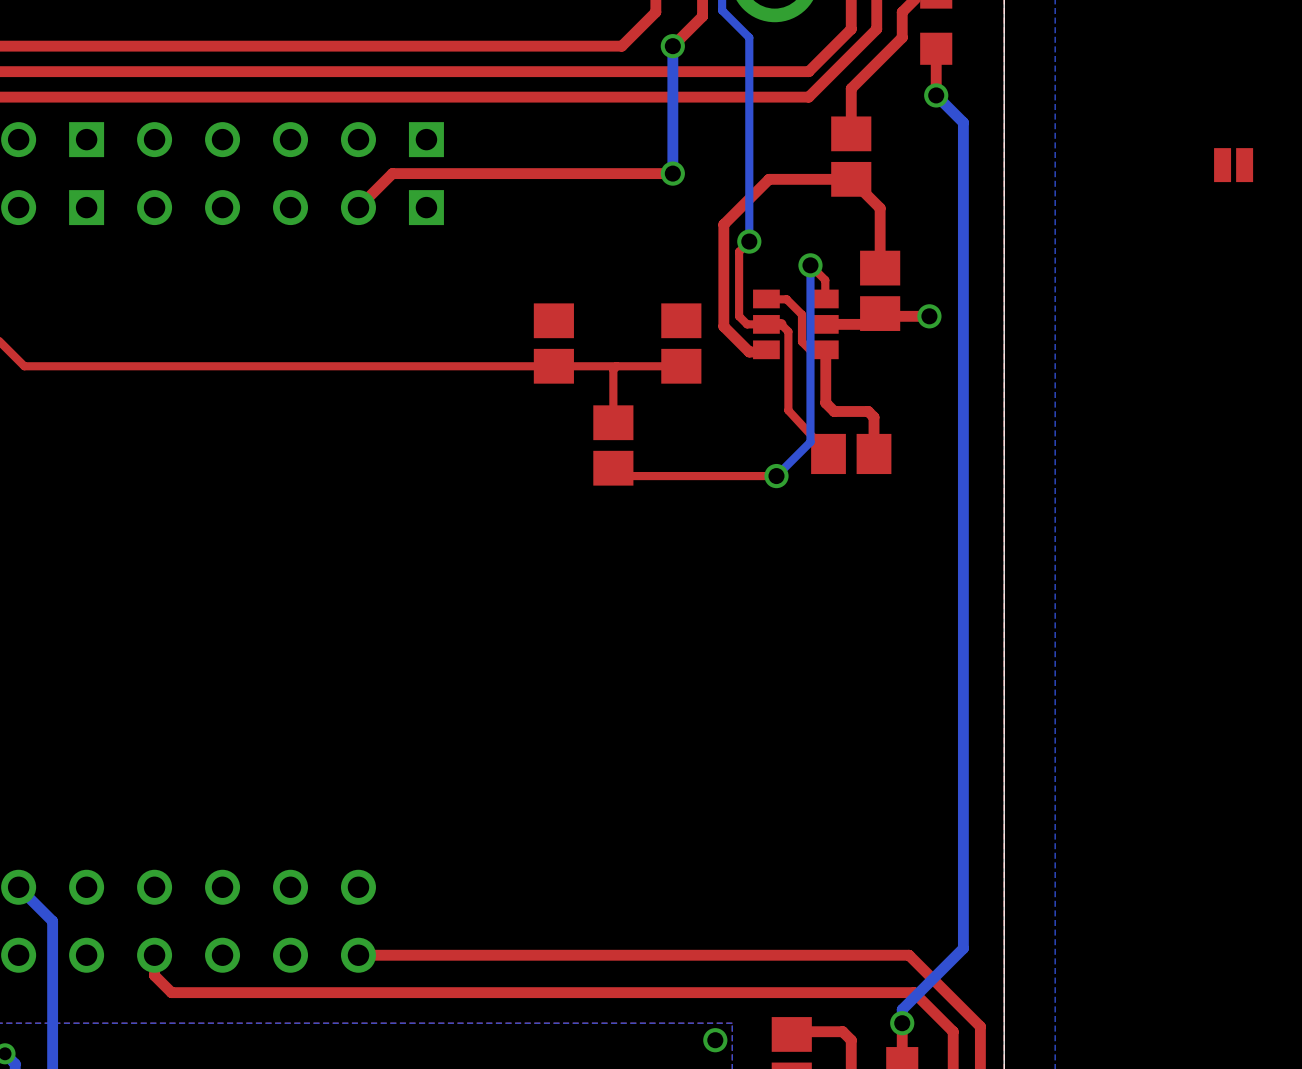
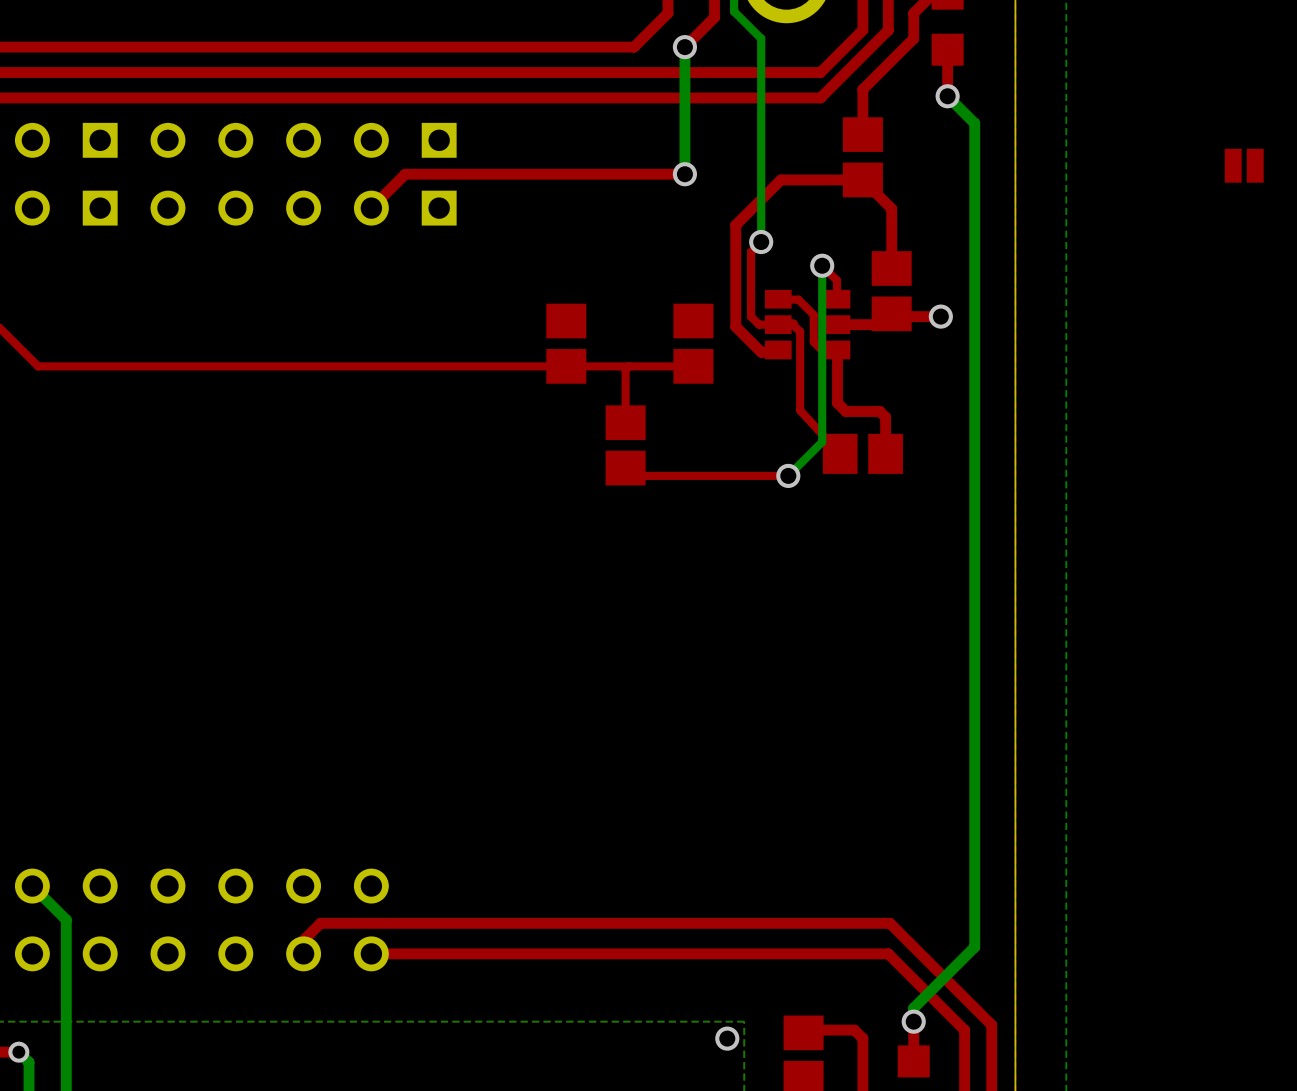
top track: (154, 955) (154, 975) (171, 992) (914, 992) -> none
top track: (909, 955) (876, 955) -> (925, 991) (888, 953)
top track: none -> (920, 953) (890, 923) (320, 923) (303, 940) (303, 953)

